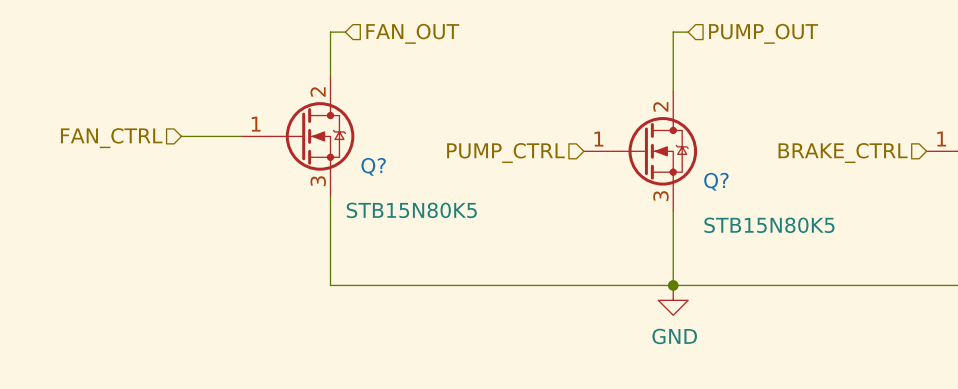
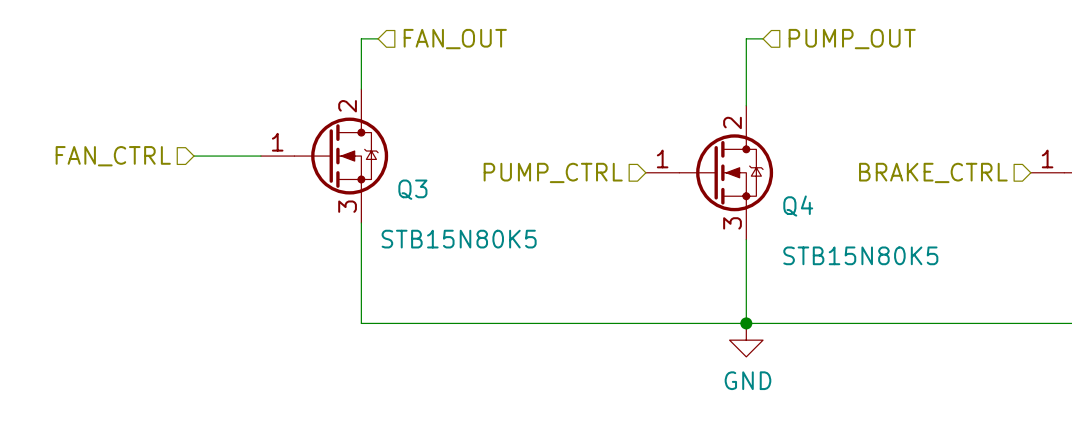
Q? name: Q? (373, 166) -> Q3 (412, 189)
Q? name: Q? (716, 181) -> Q4 (798, 206)

